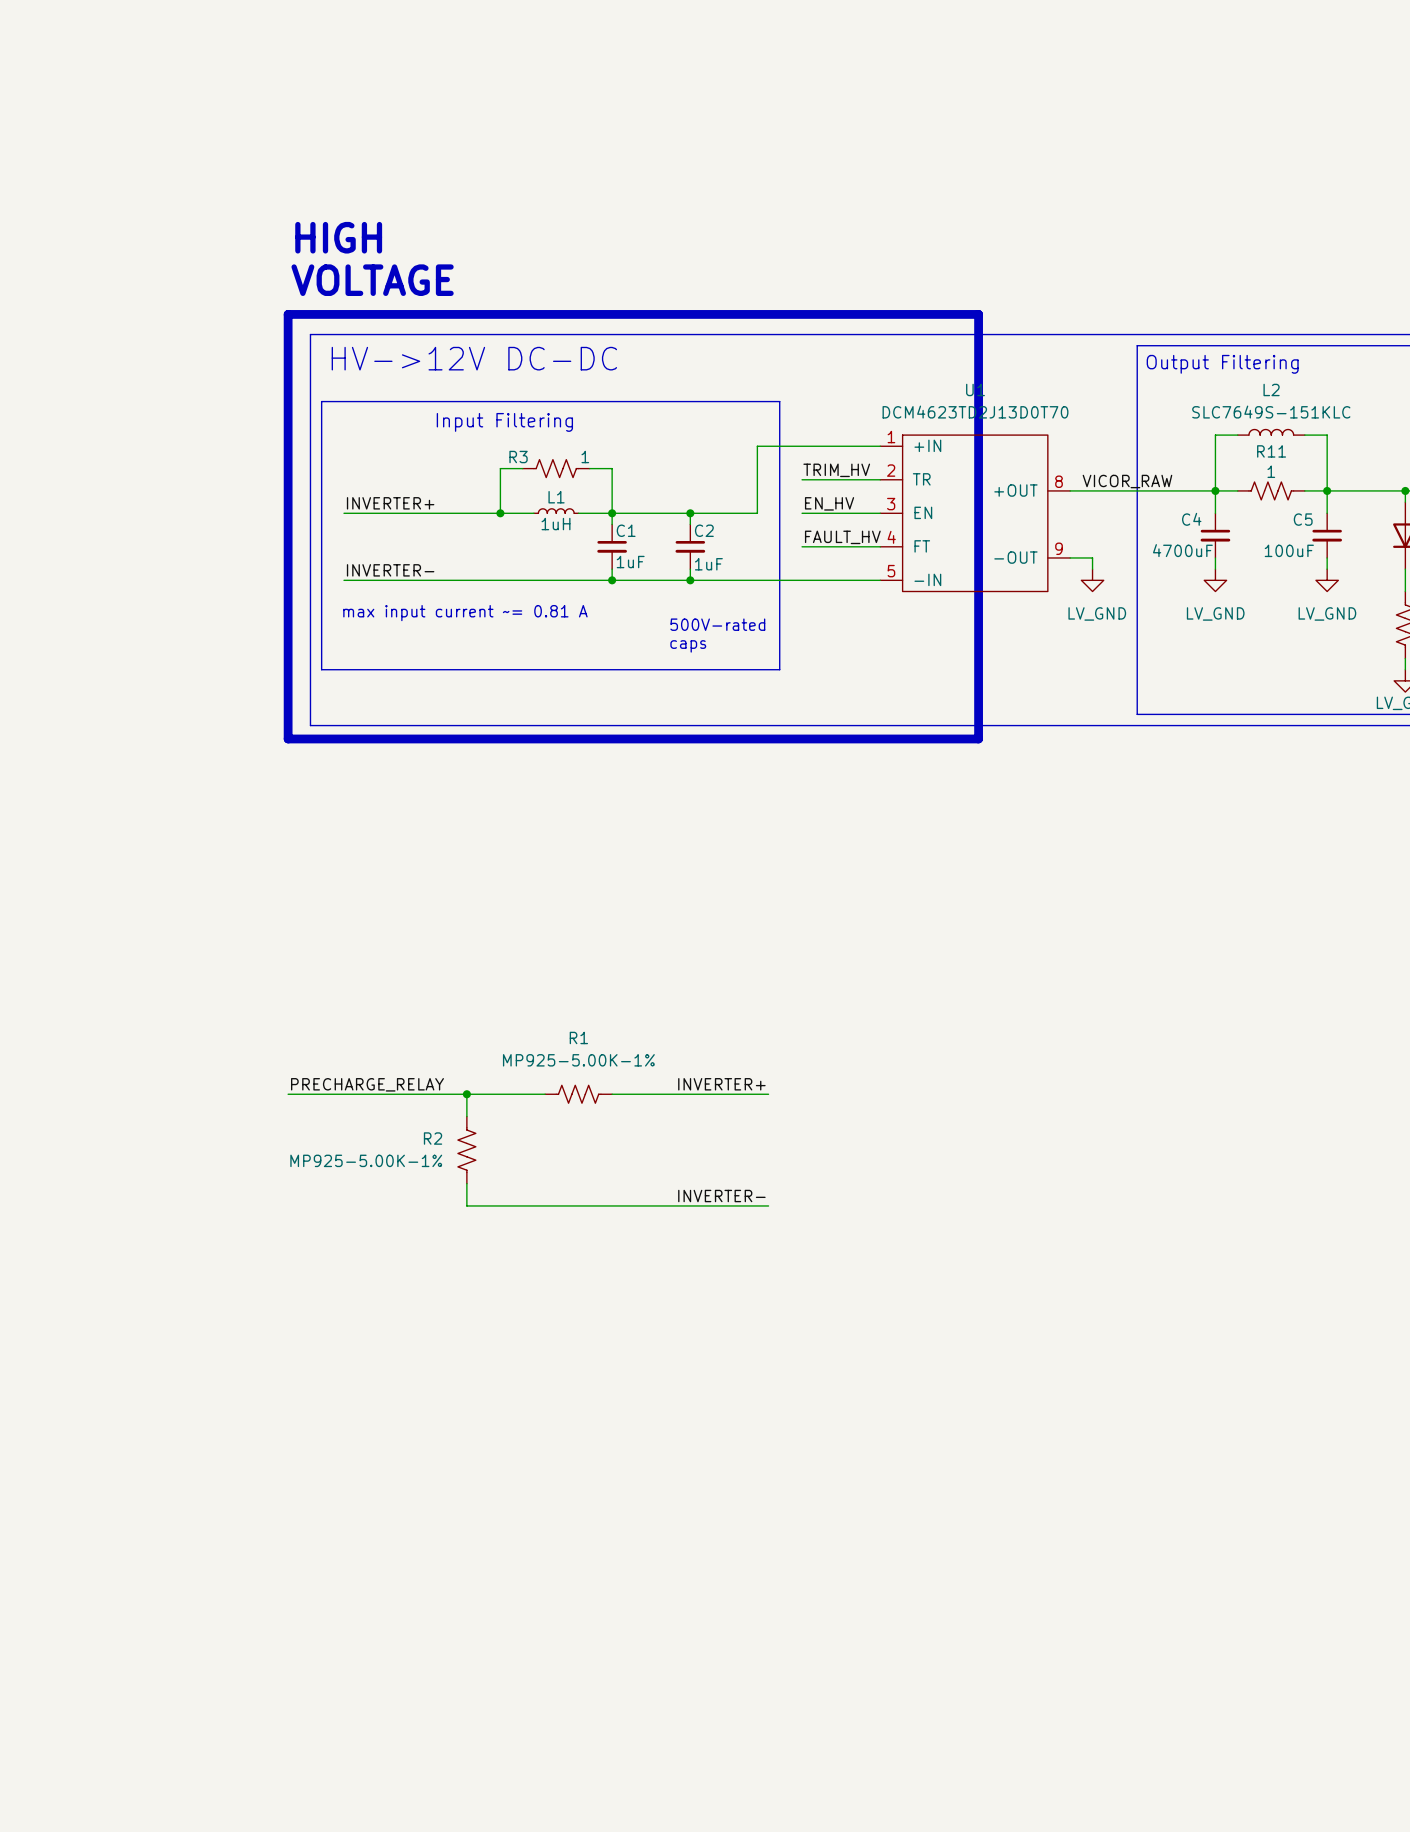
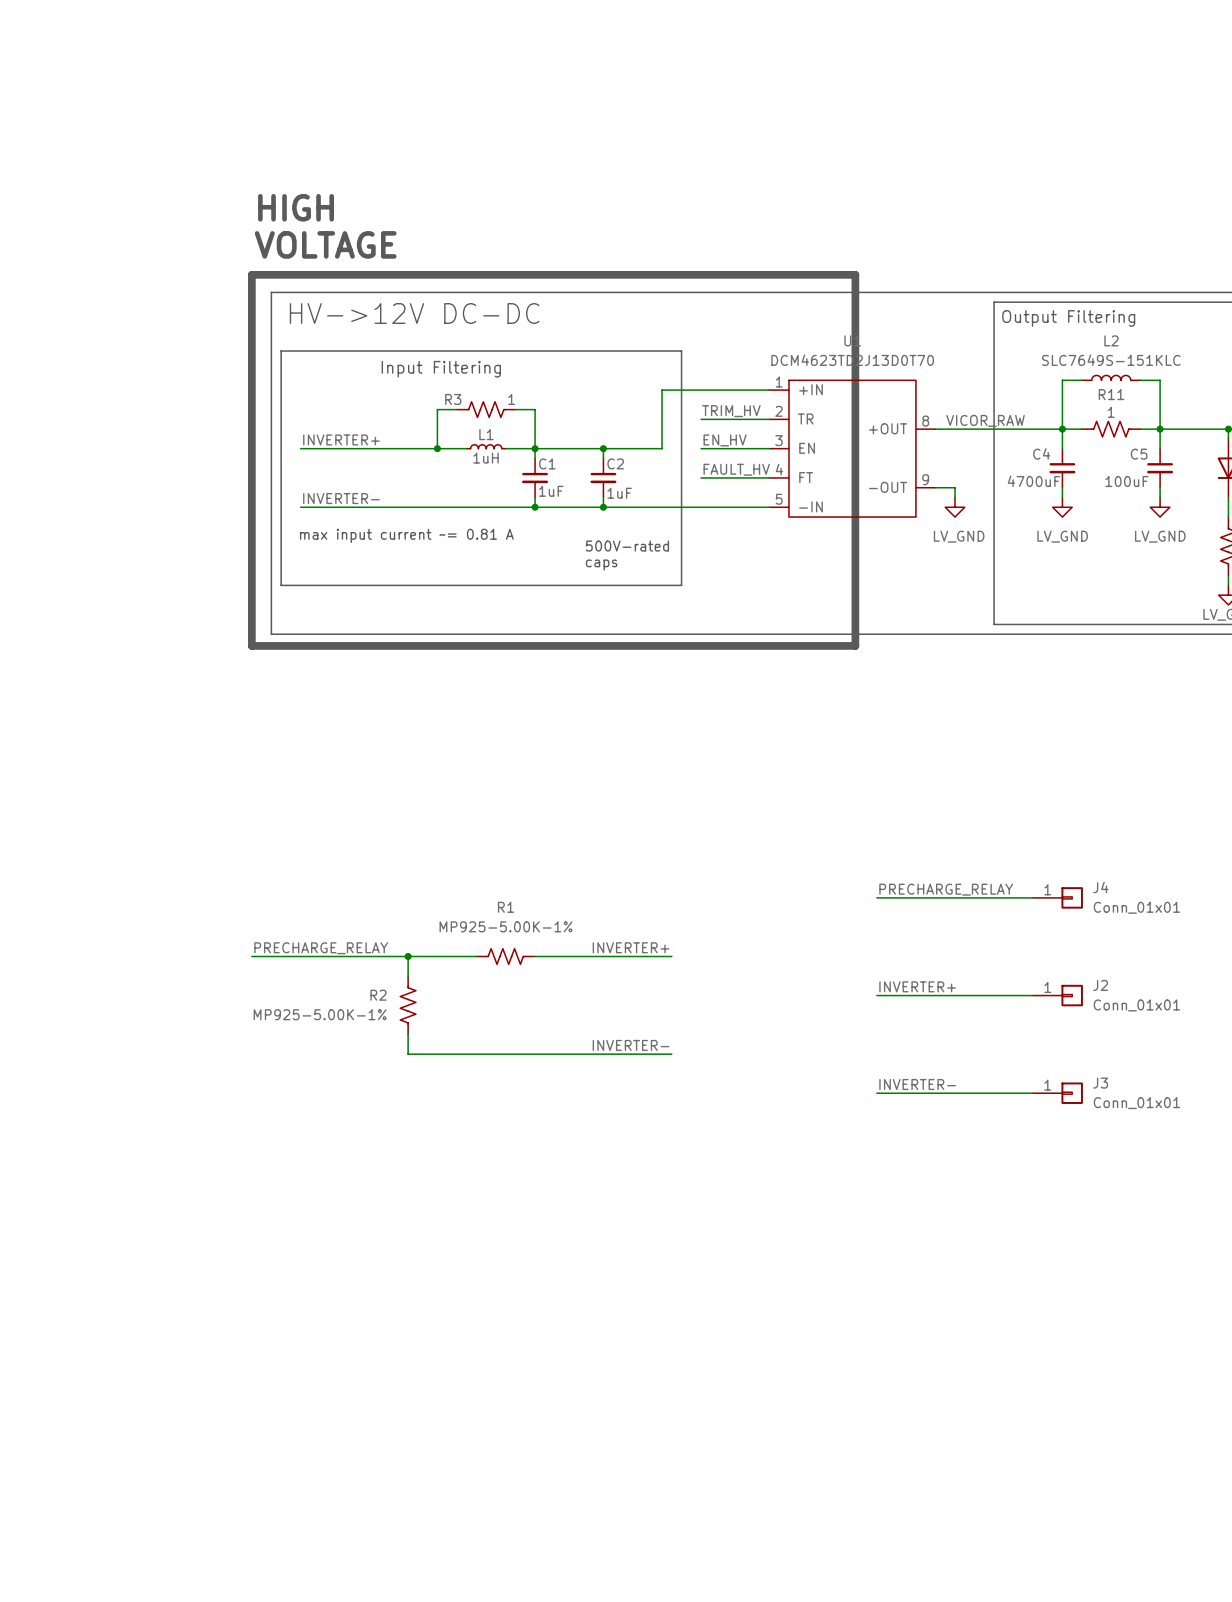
label: none -> PRECHARGE_RELAY (946, 889)
wire: none -> (876, 897) (1033, 897)
J4: none -> Conn_01x01 (1058, 897)
label: none -> INVERTER+ (917, 986)
wire: none -> (876, 995) (1033, 995)
J2: none -> Conn_01x01 (1058, 995)
label: none -> INVERTER- (917, 1084)
wire: none -> (876, 1093) (1033, 1093)
J3: none -> Conn_01x01 (1058, 1093)

